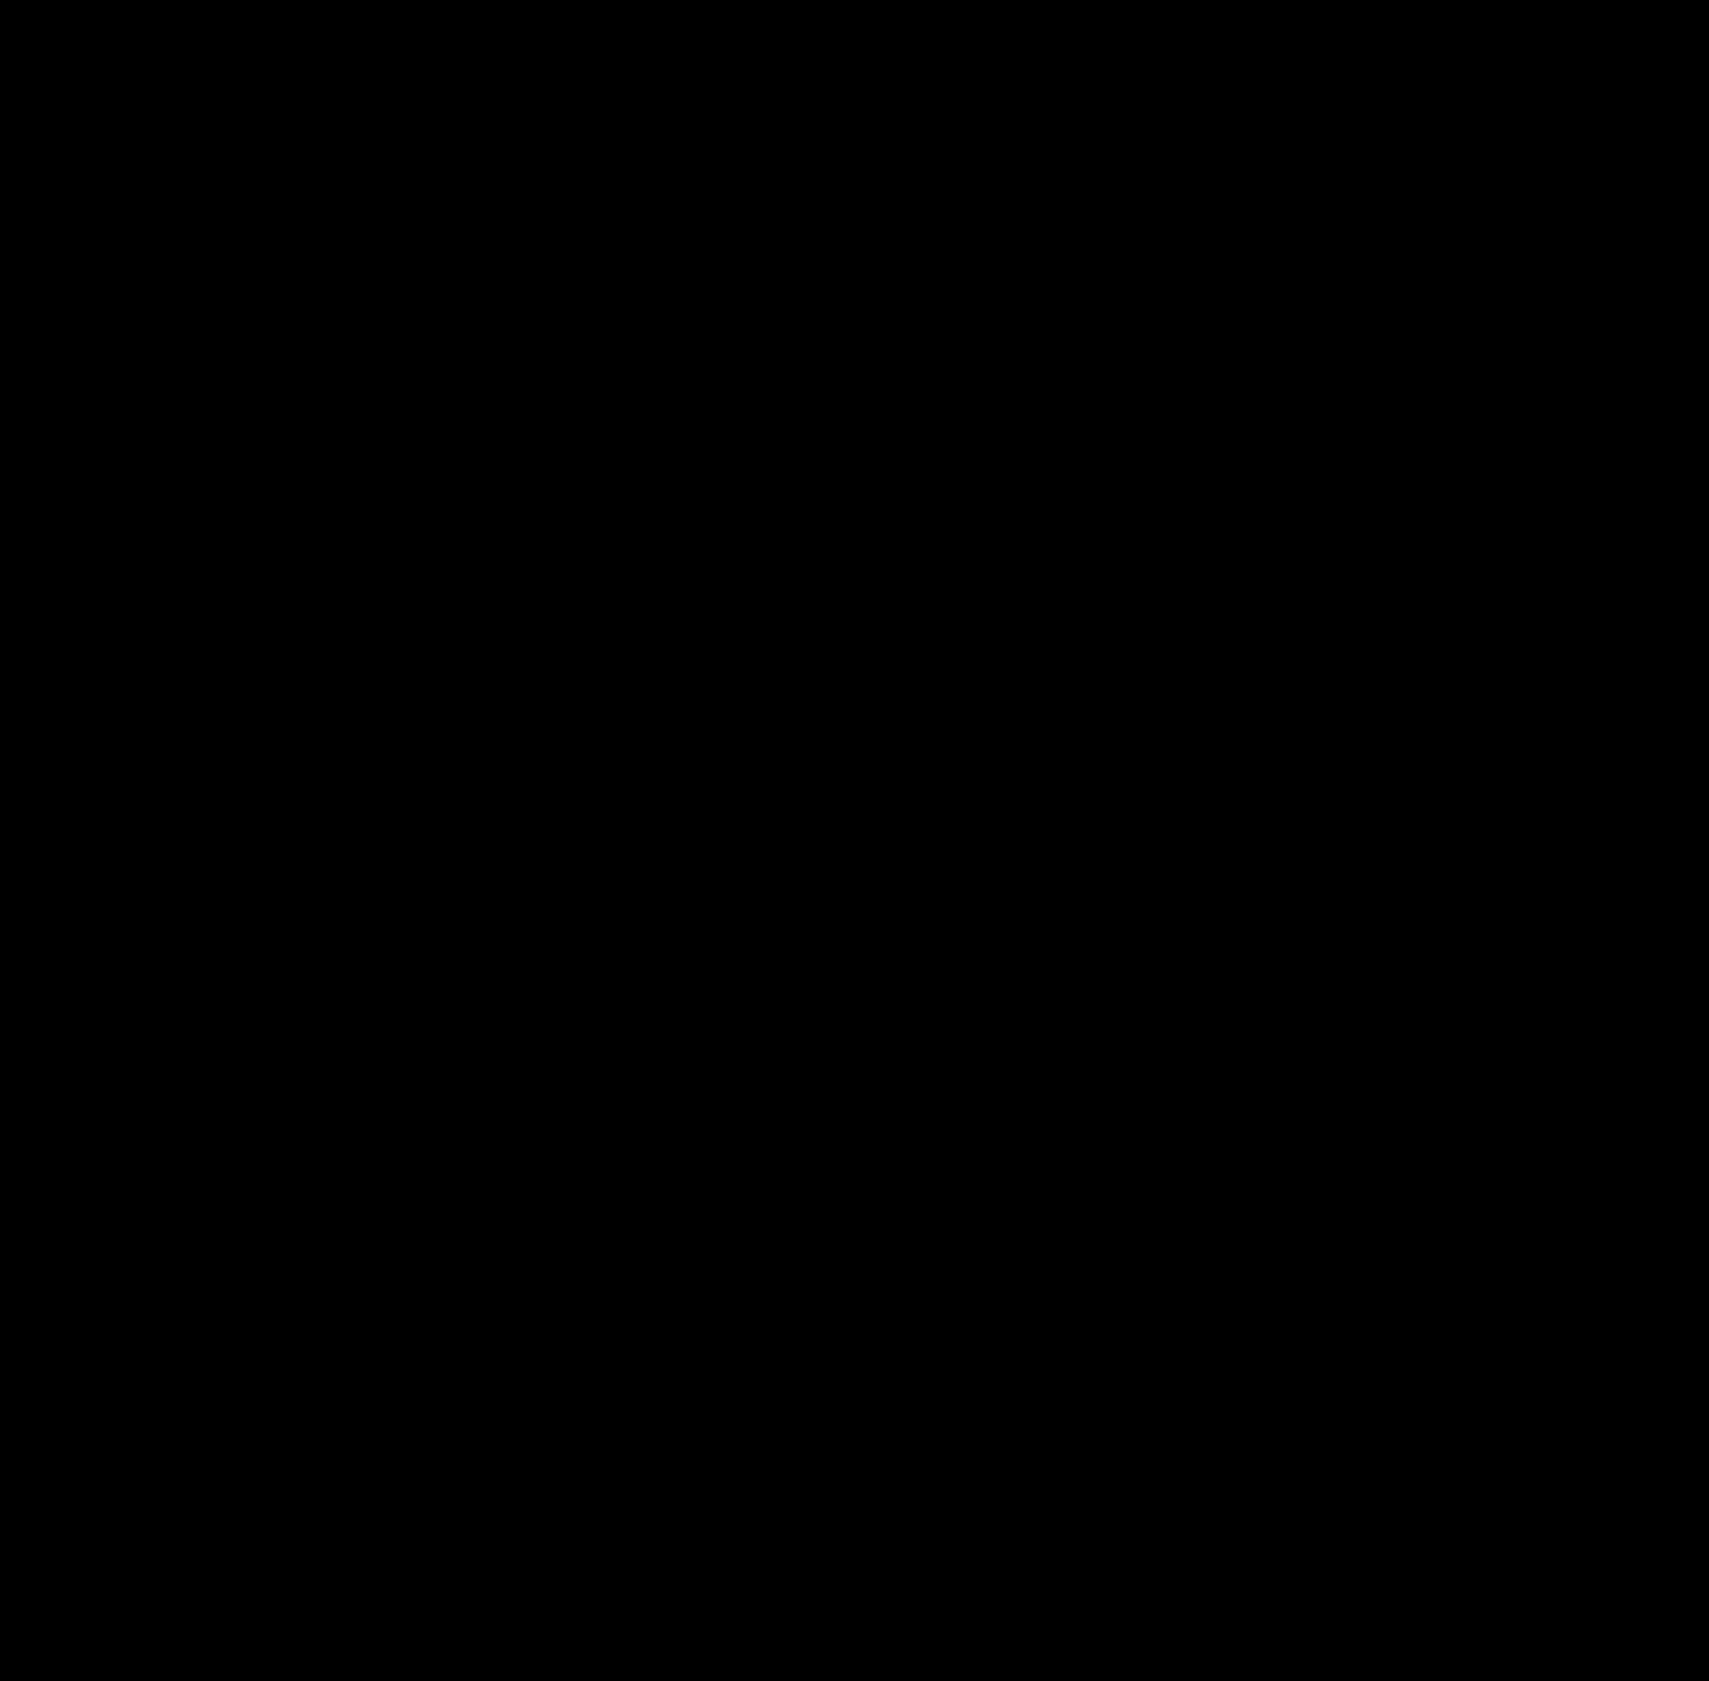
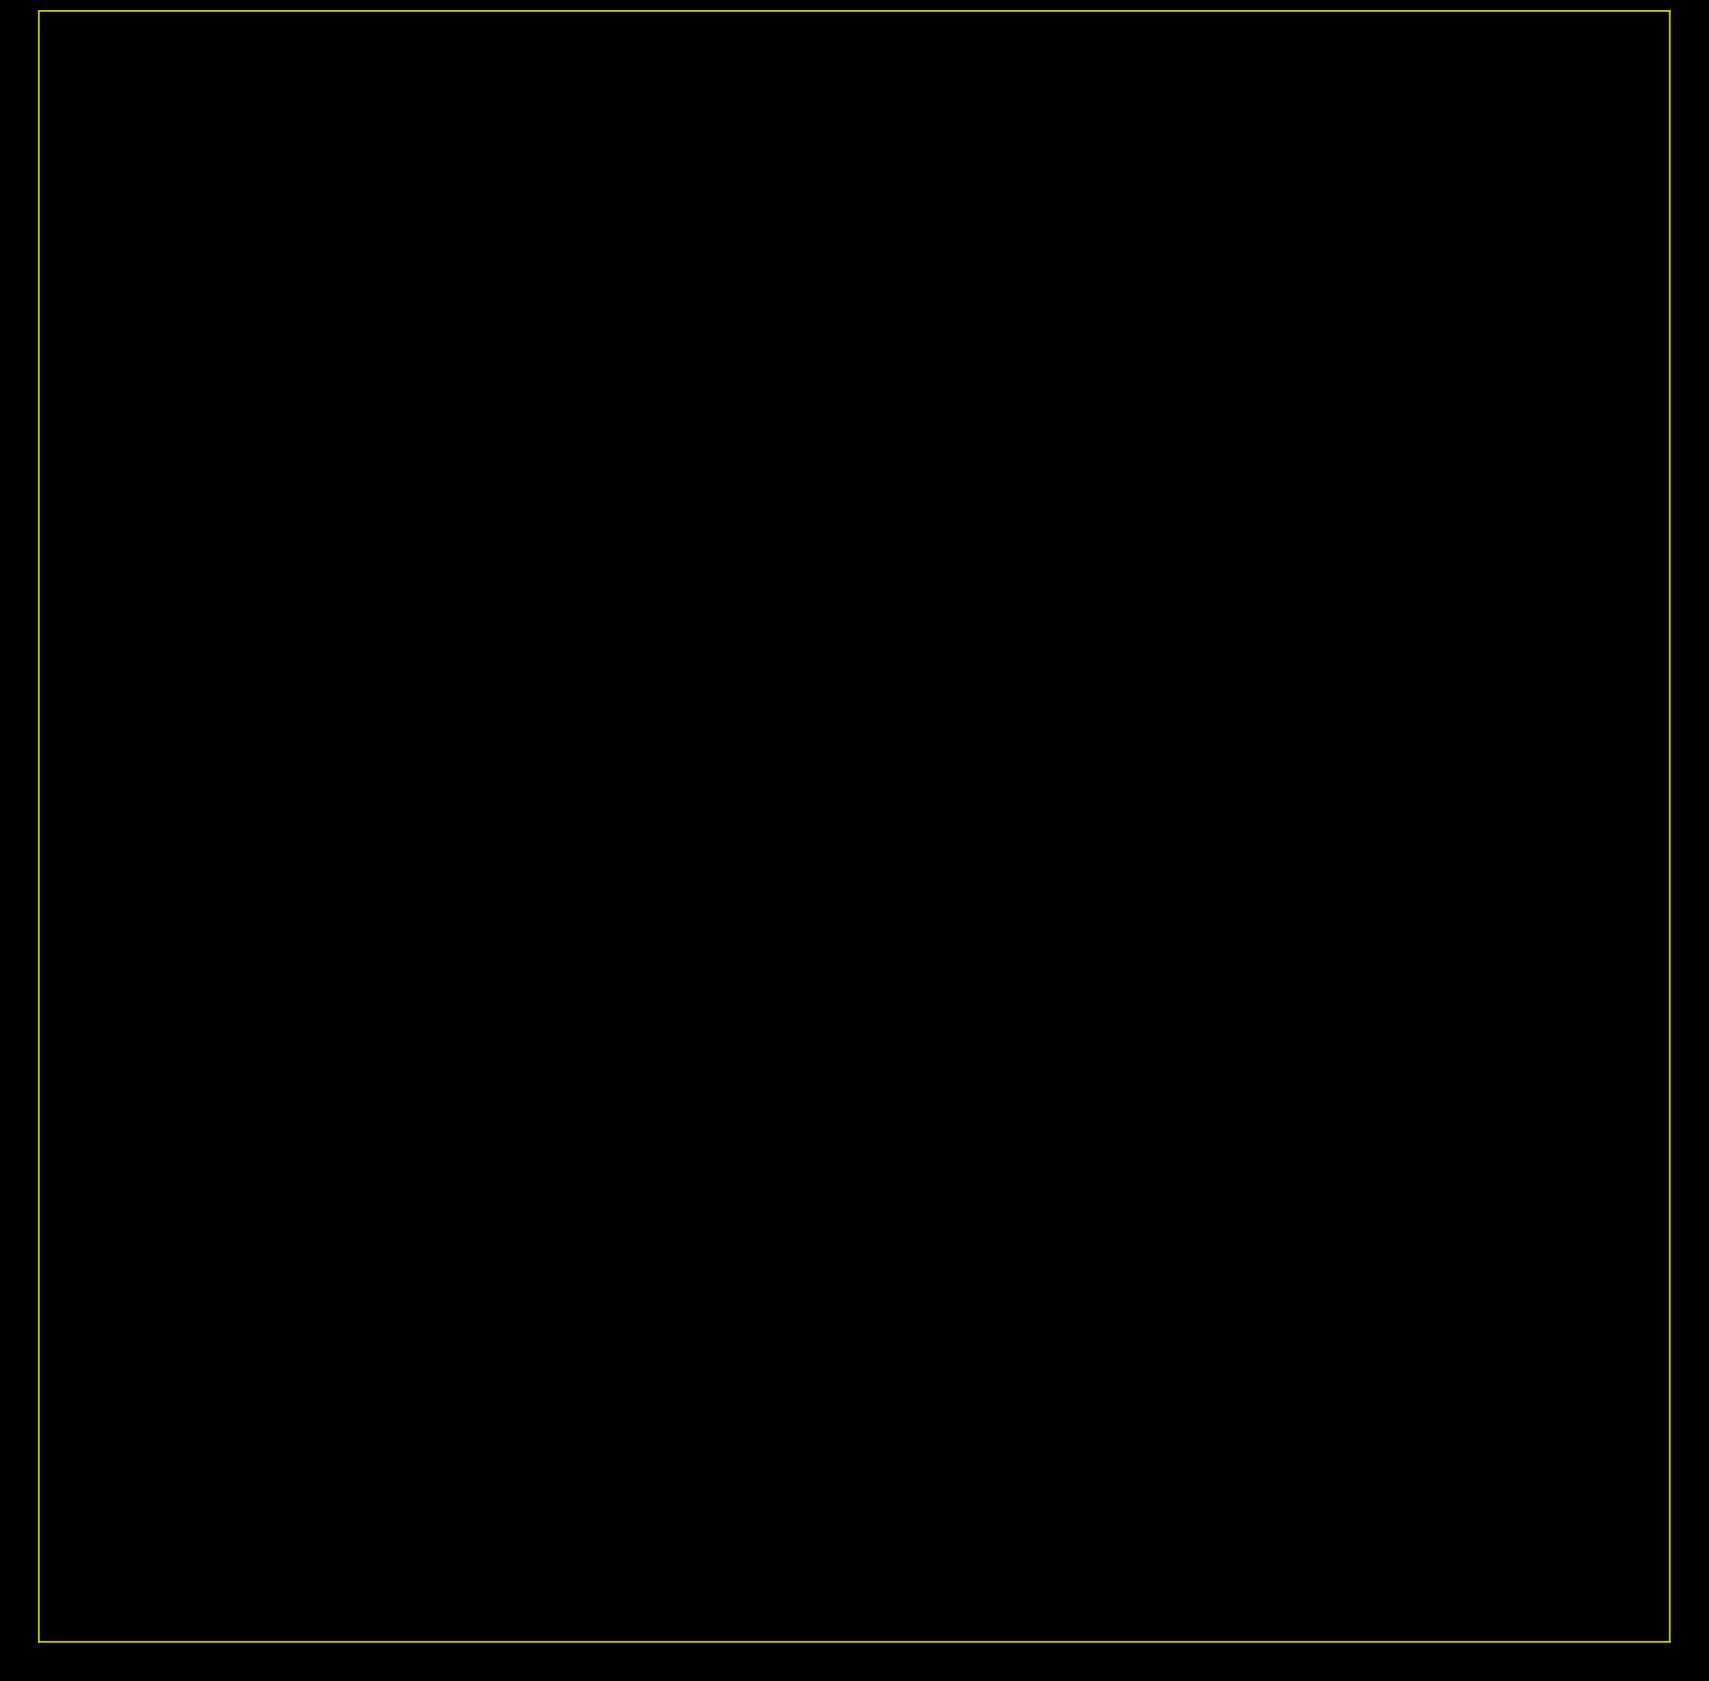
board edge: none -> (38, 10) (1669, 10) (1669, 1641) (38, 1641) (38, 10)

